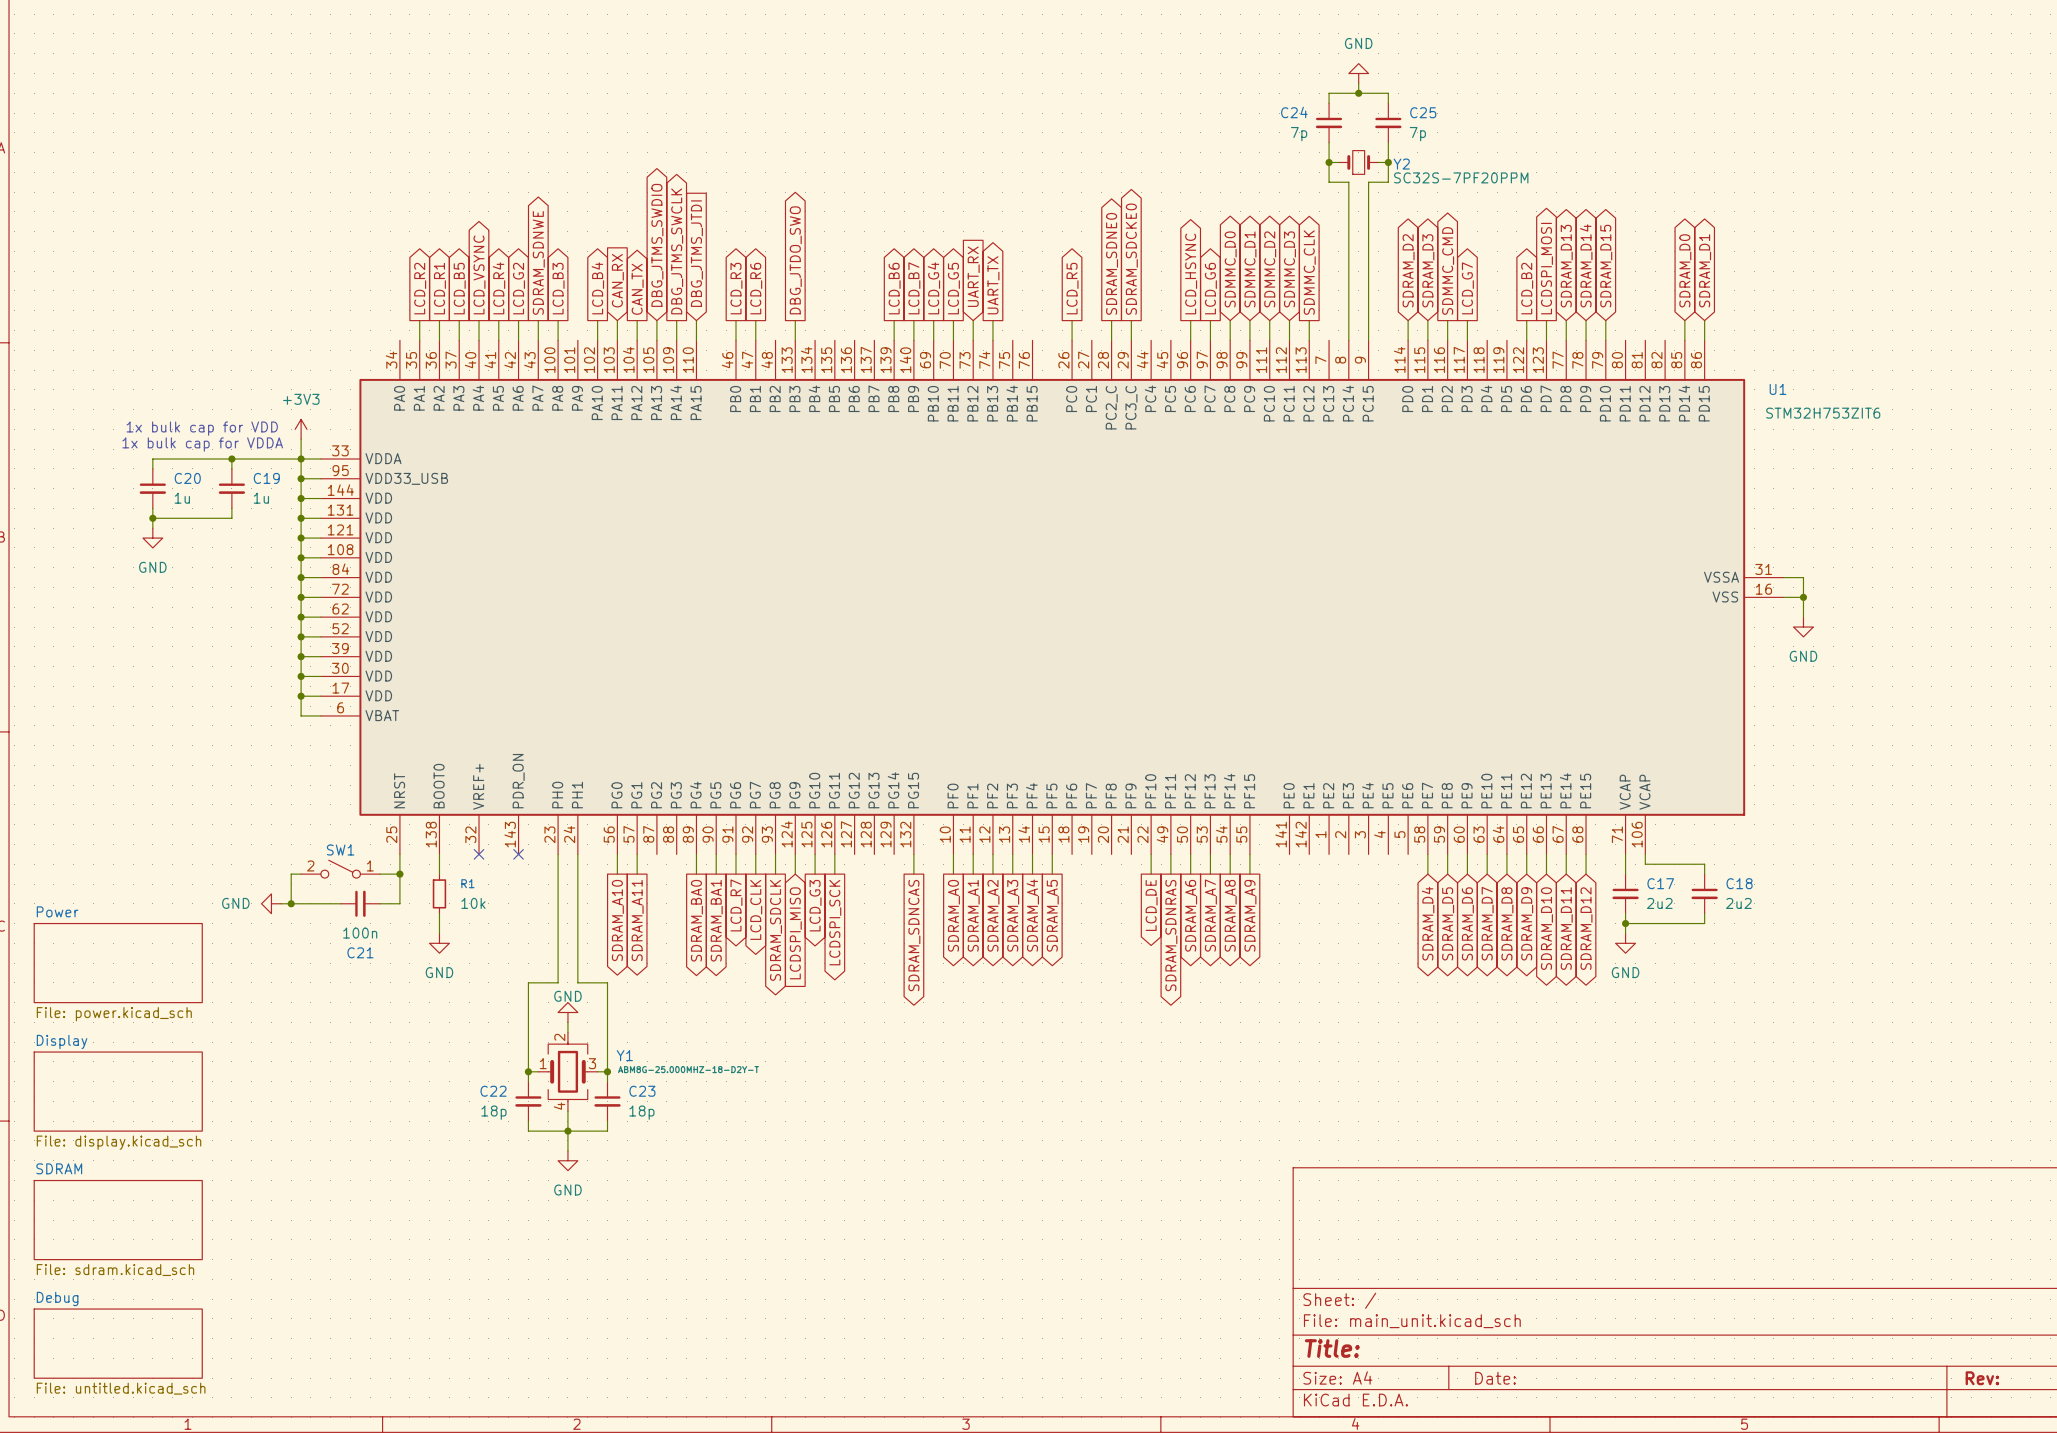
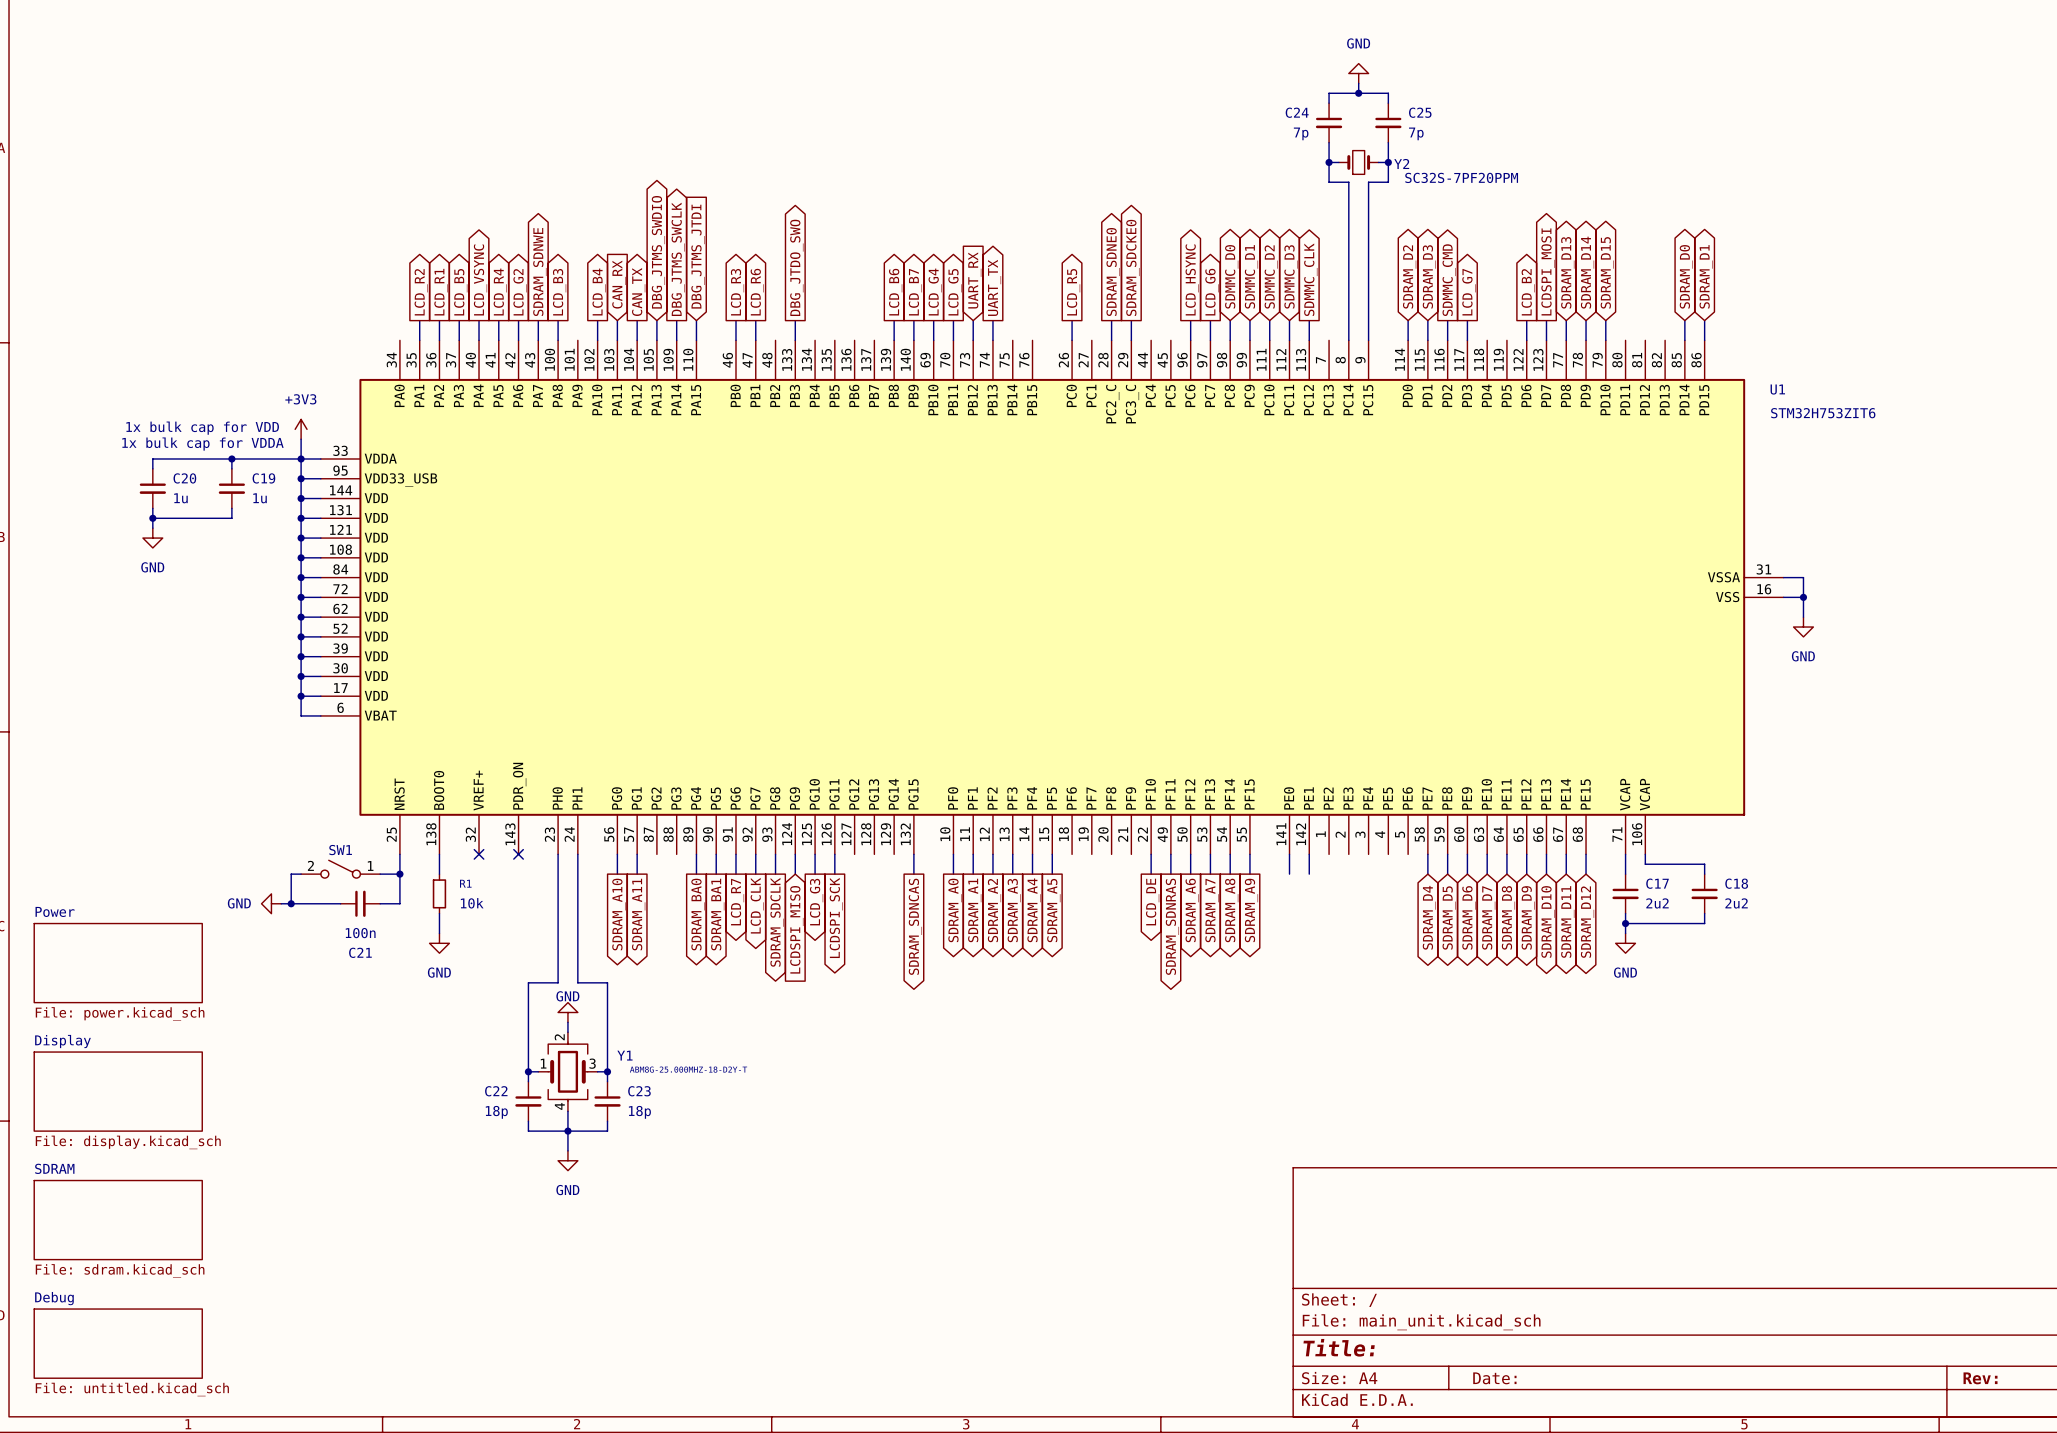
wire: none -> (1289, 854) (1289, 874)
wire: none -> (1309, 854) (1309, 874)

